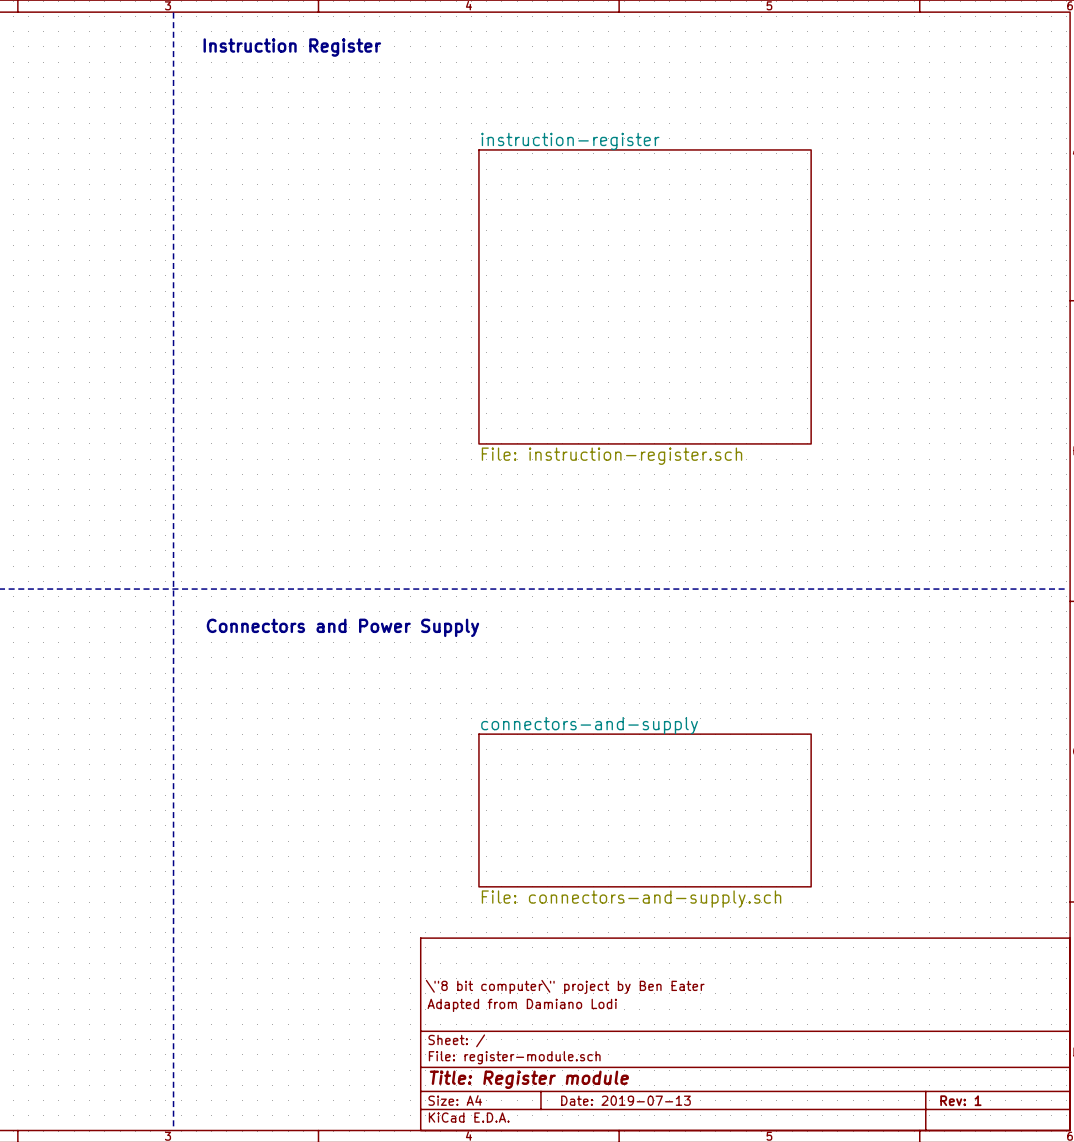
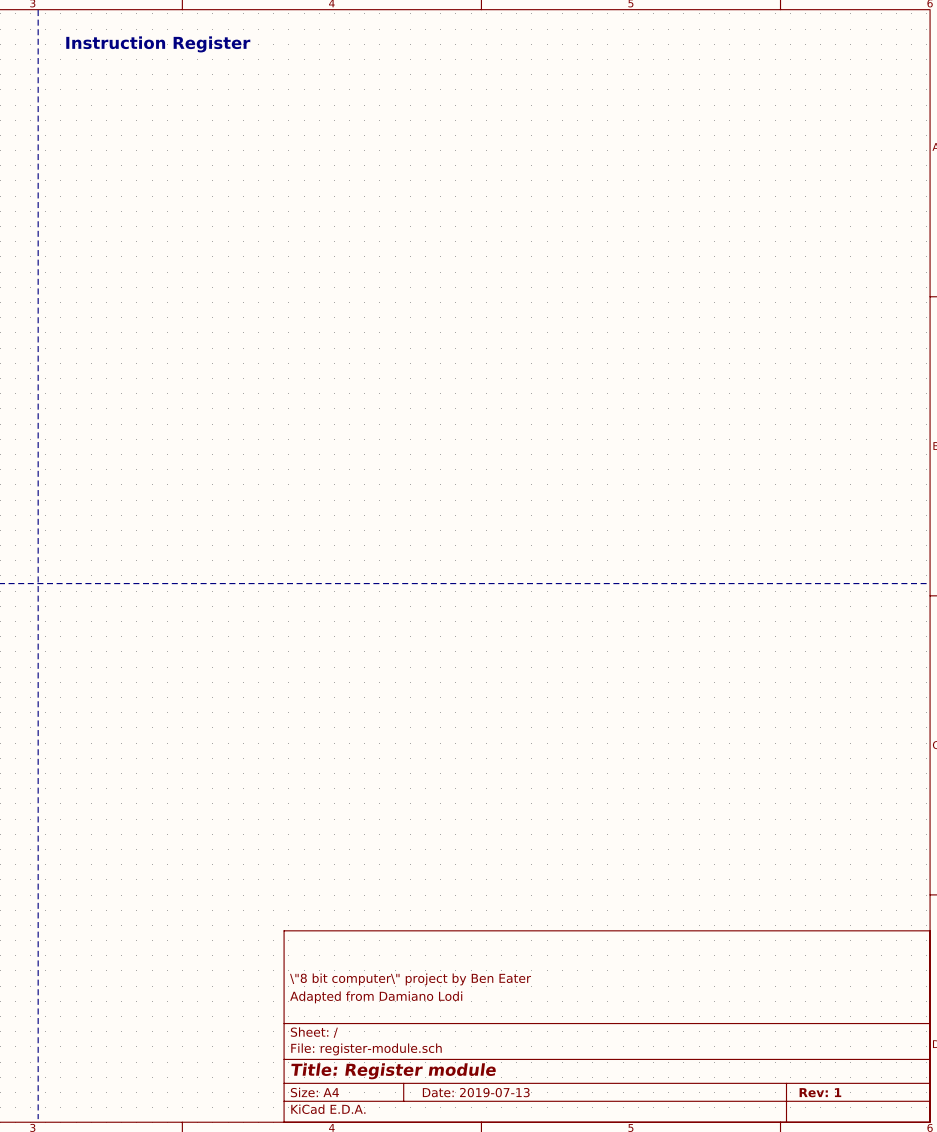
sheet instruction-register: File: instruction-register.sch (645, 296) -> none
text: Connectors and Power Supply (342, 627) -> none
sheet connectors-and-supply: File: connectors-and-supply.sch (645, 810) -> none

